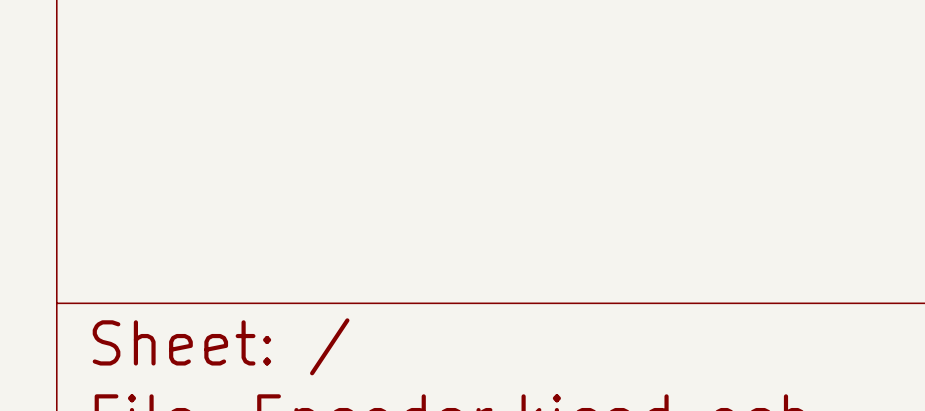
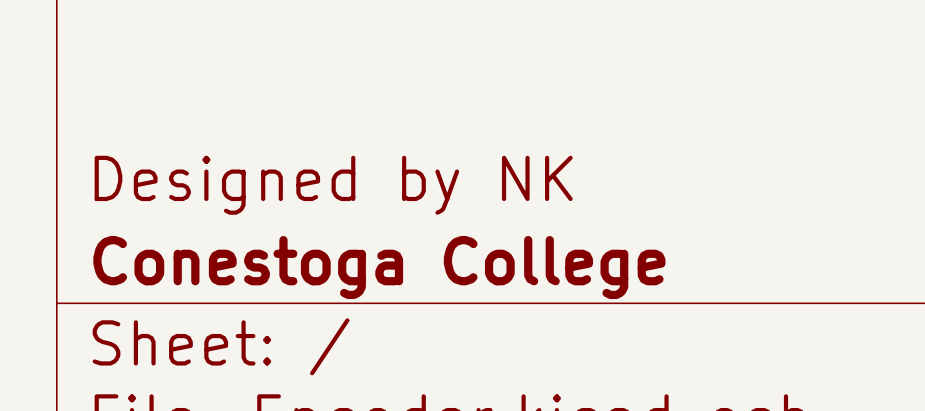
title block: none -> Designed by NK (333, 185)
title block: none -> Conestoga College (379, 267)

